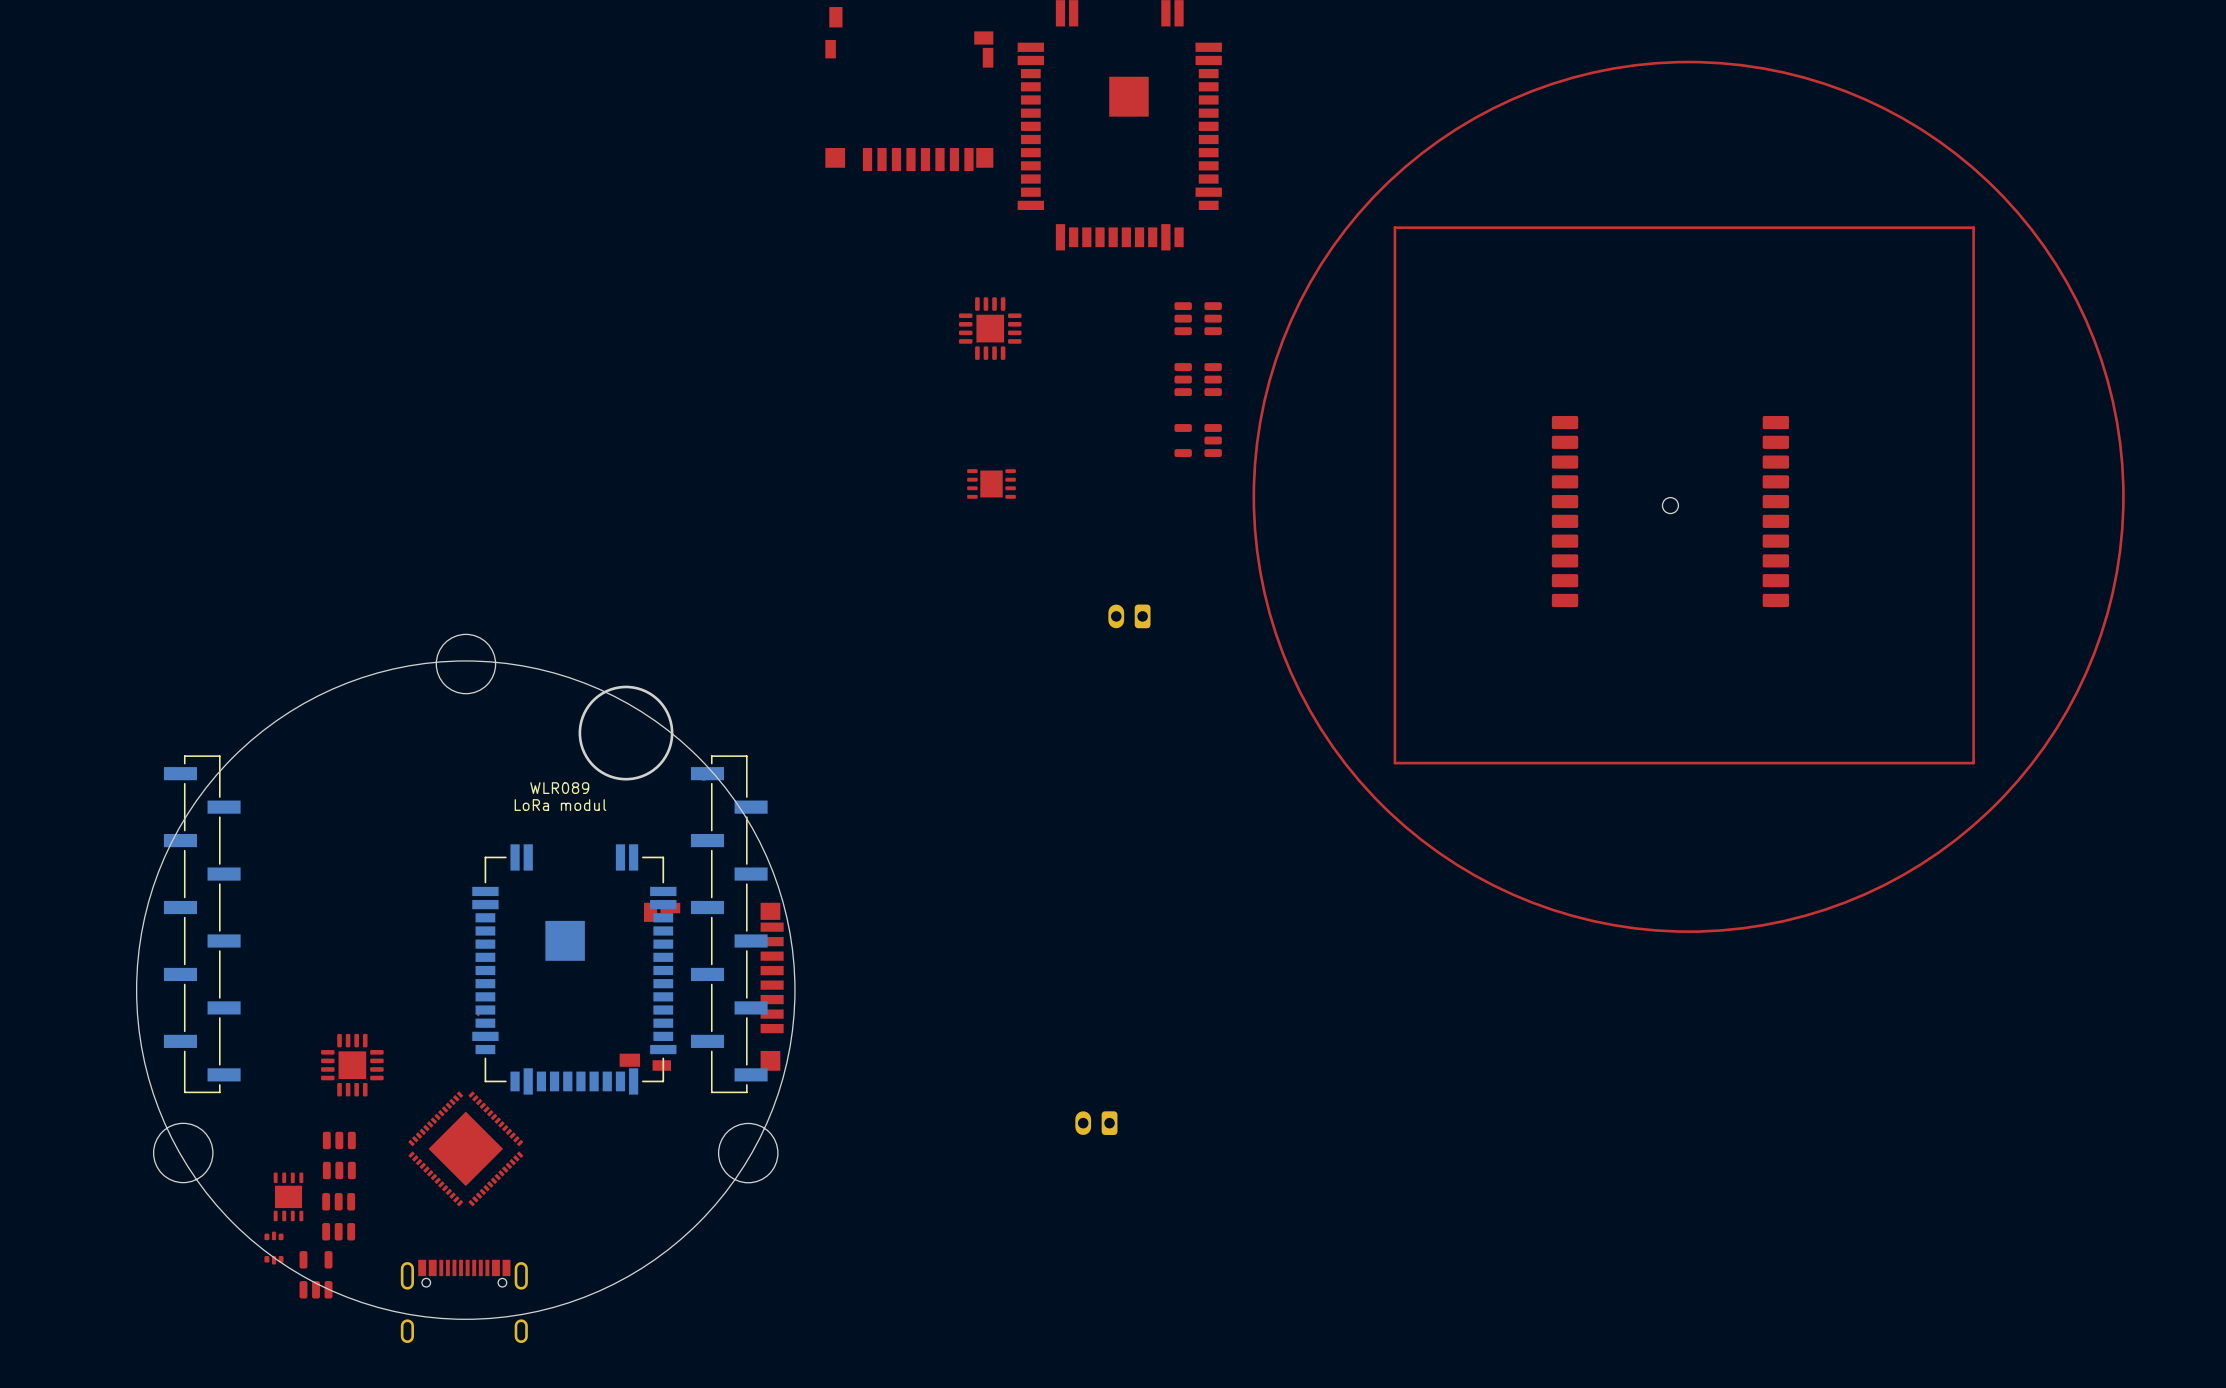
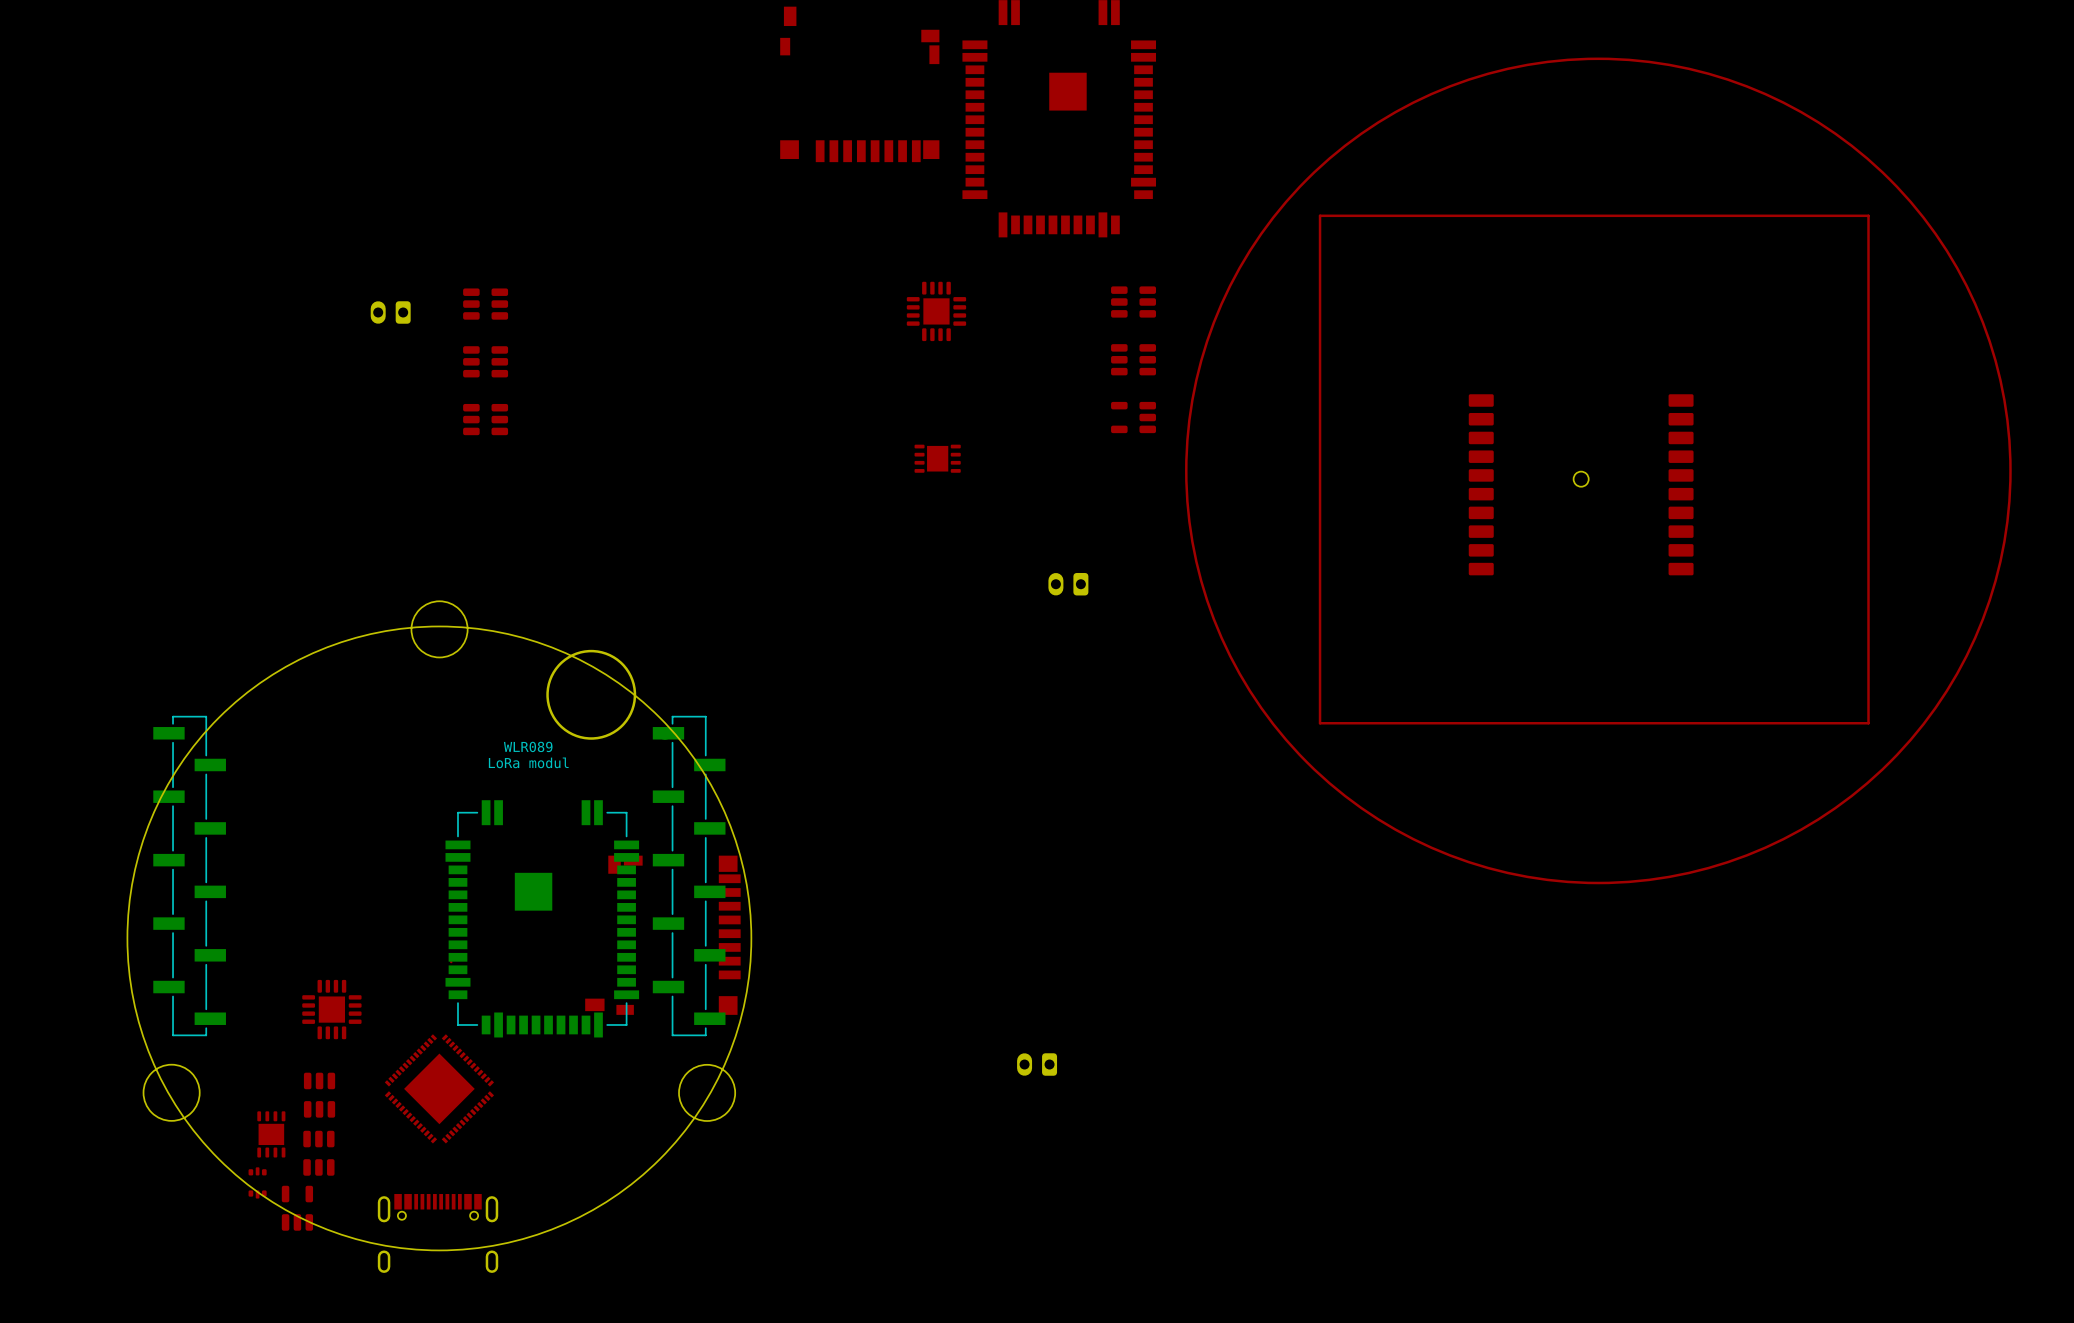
part: none -> (485, 304)
part: none -> (390, 312)
part: none -> (485, 361)
part: none -> (485, 419)

